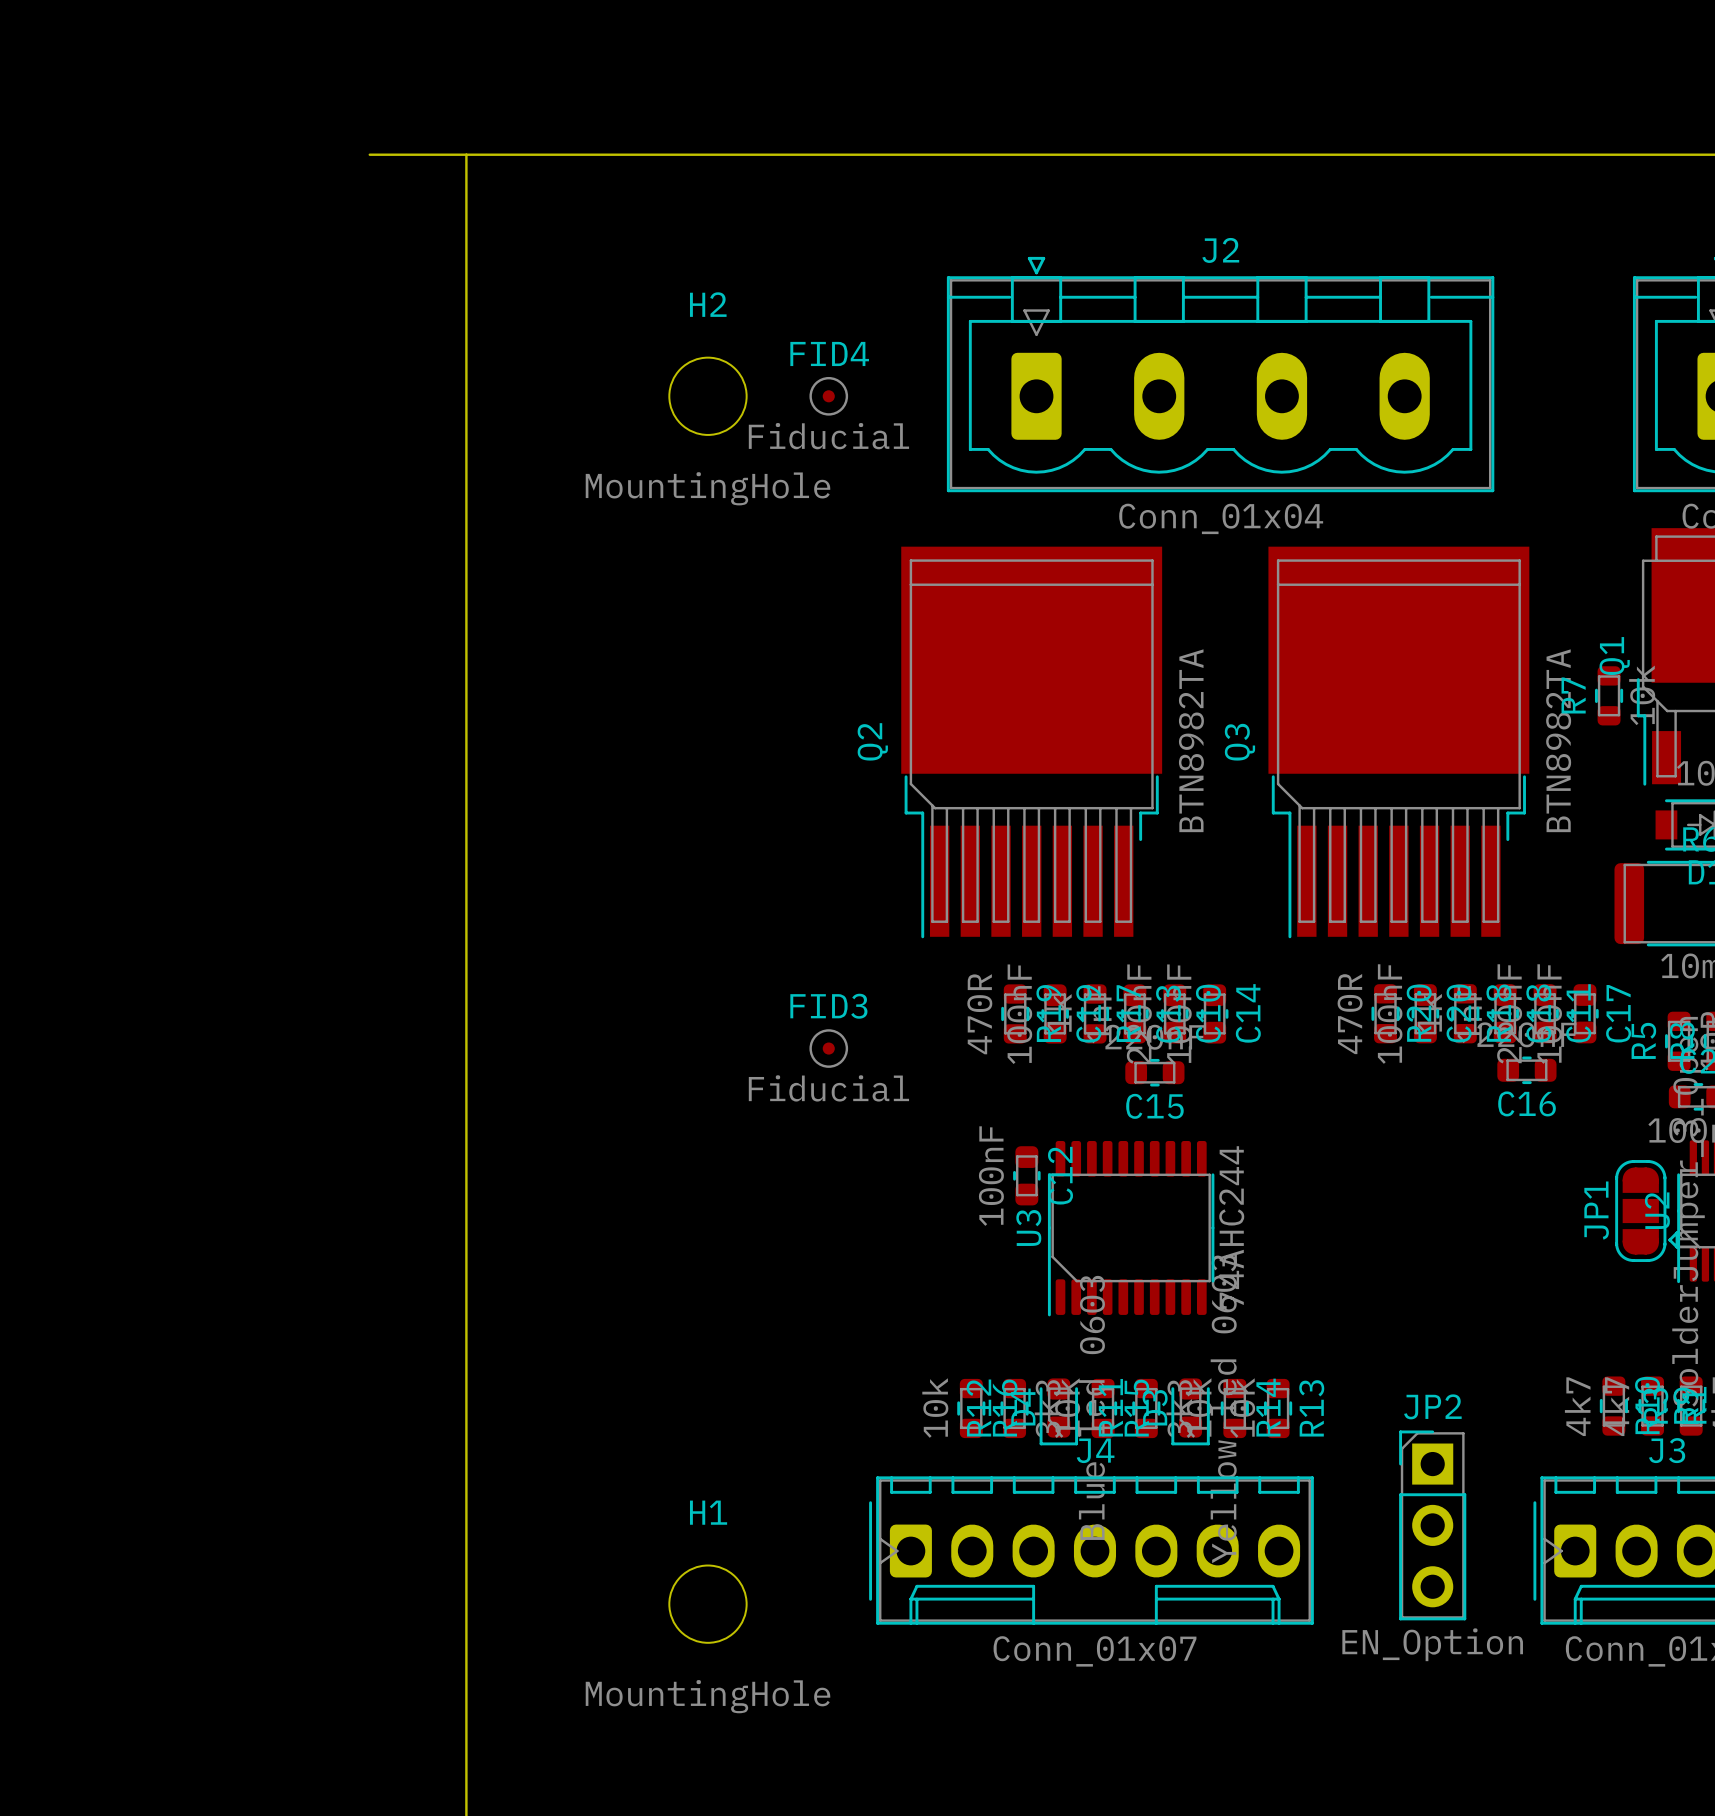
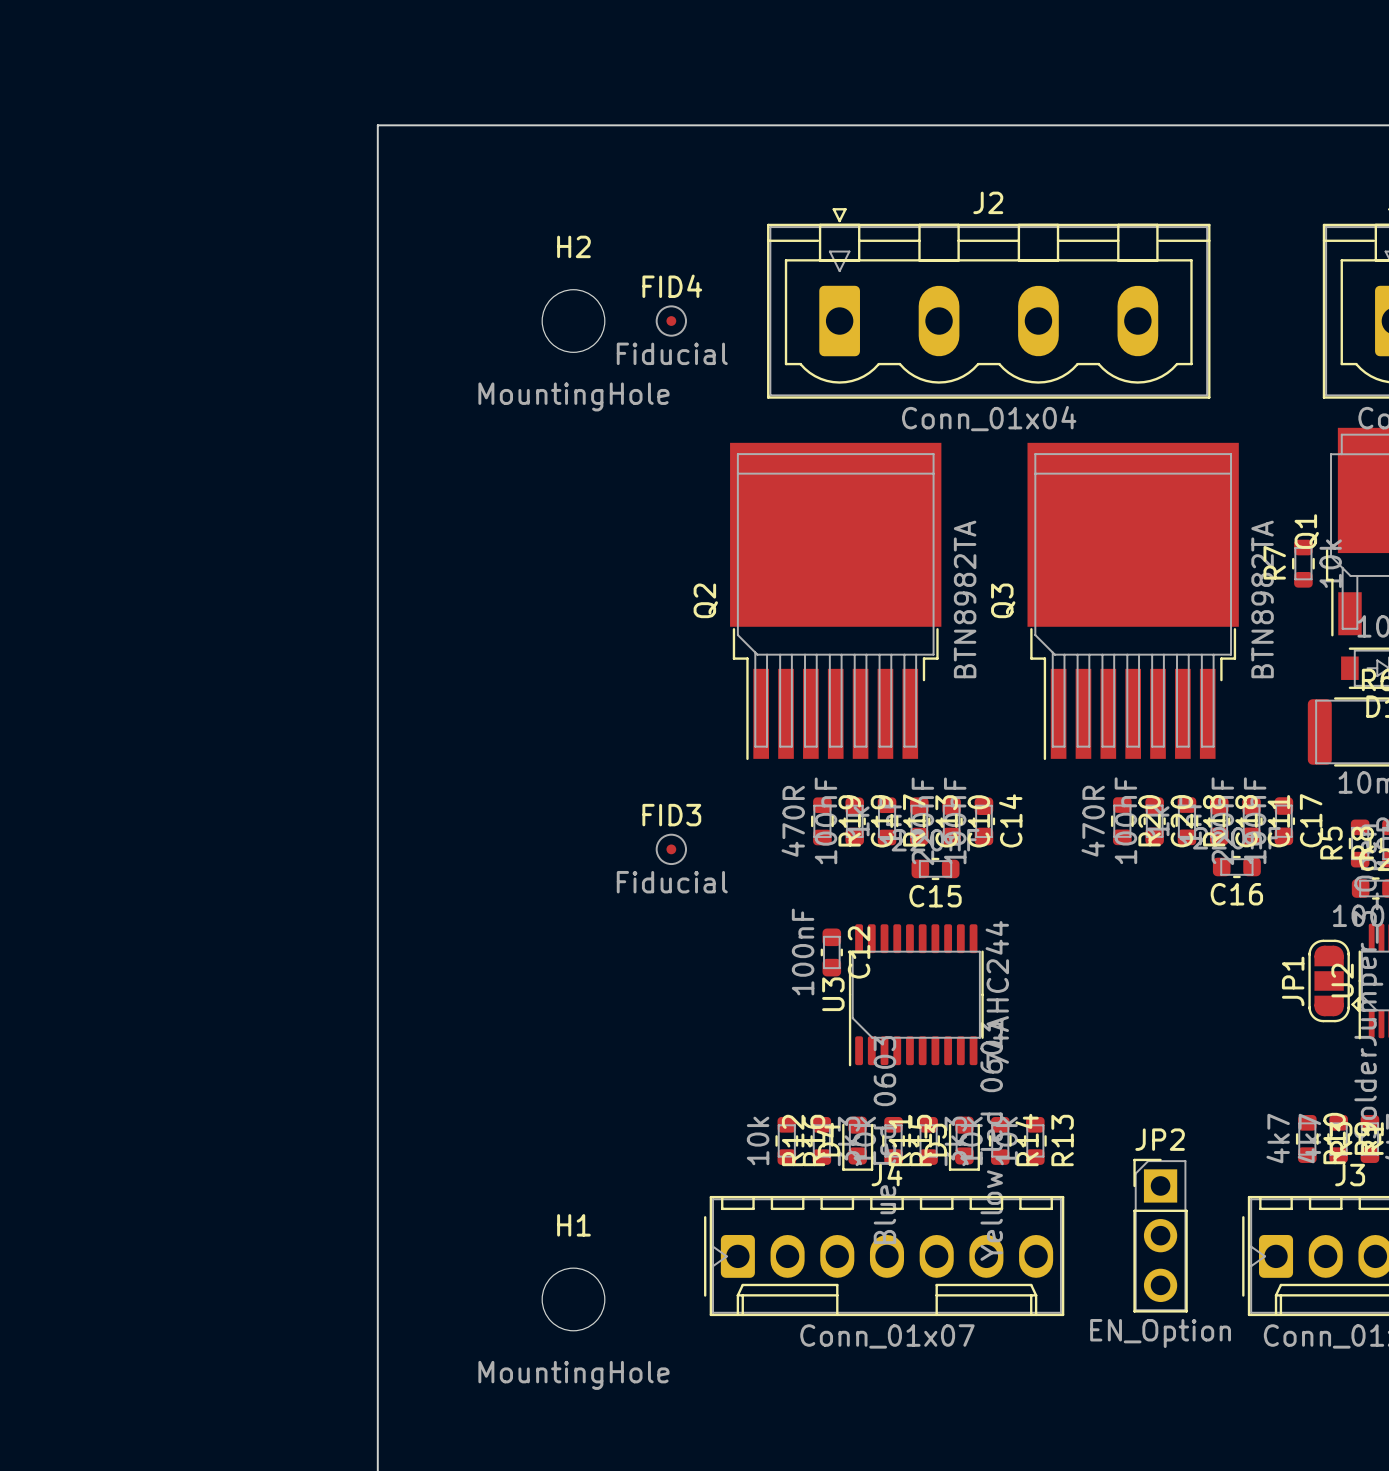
board edge: (369, 154) (466, 154) -> none

